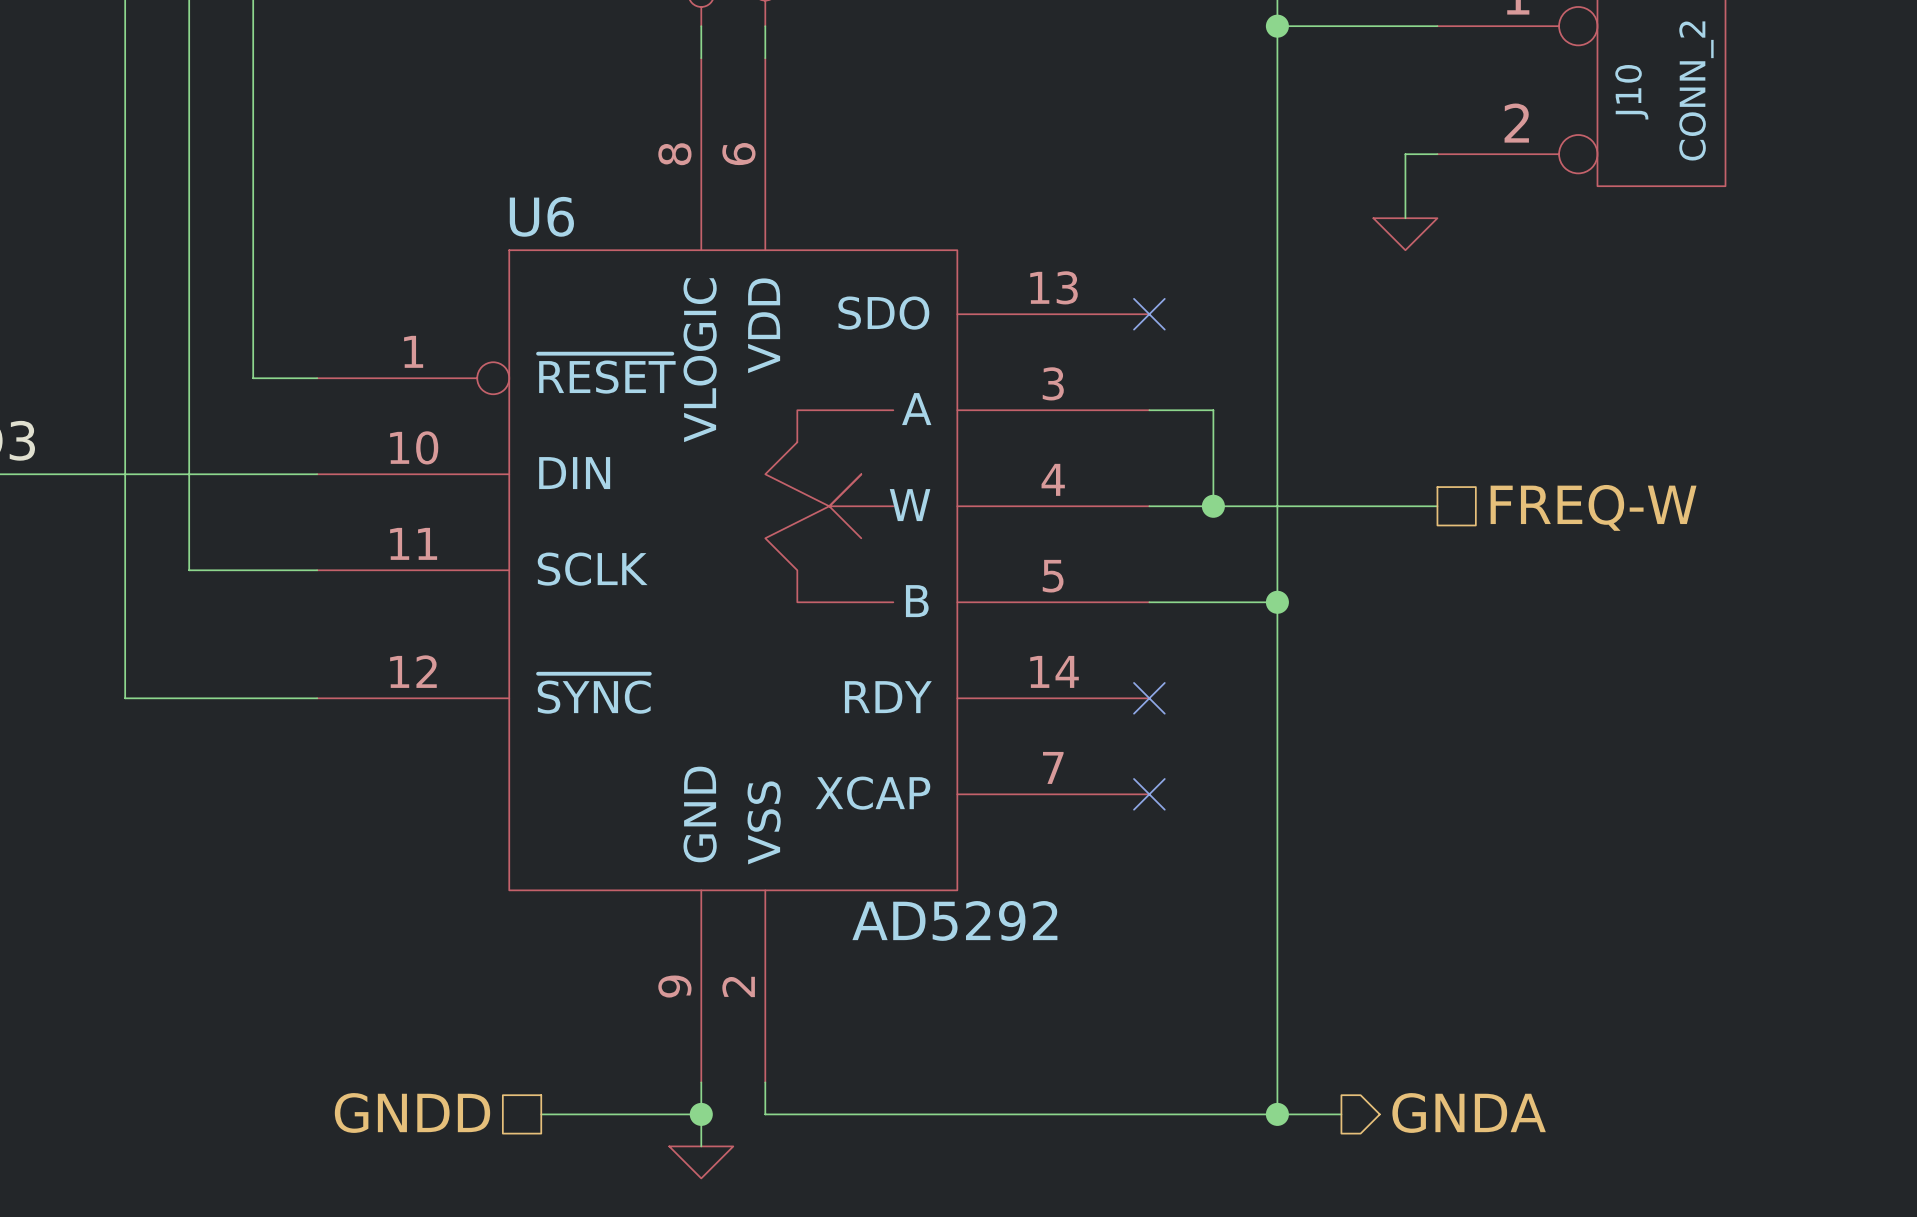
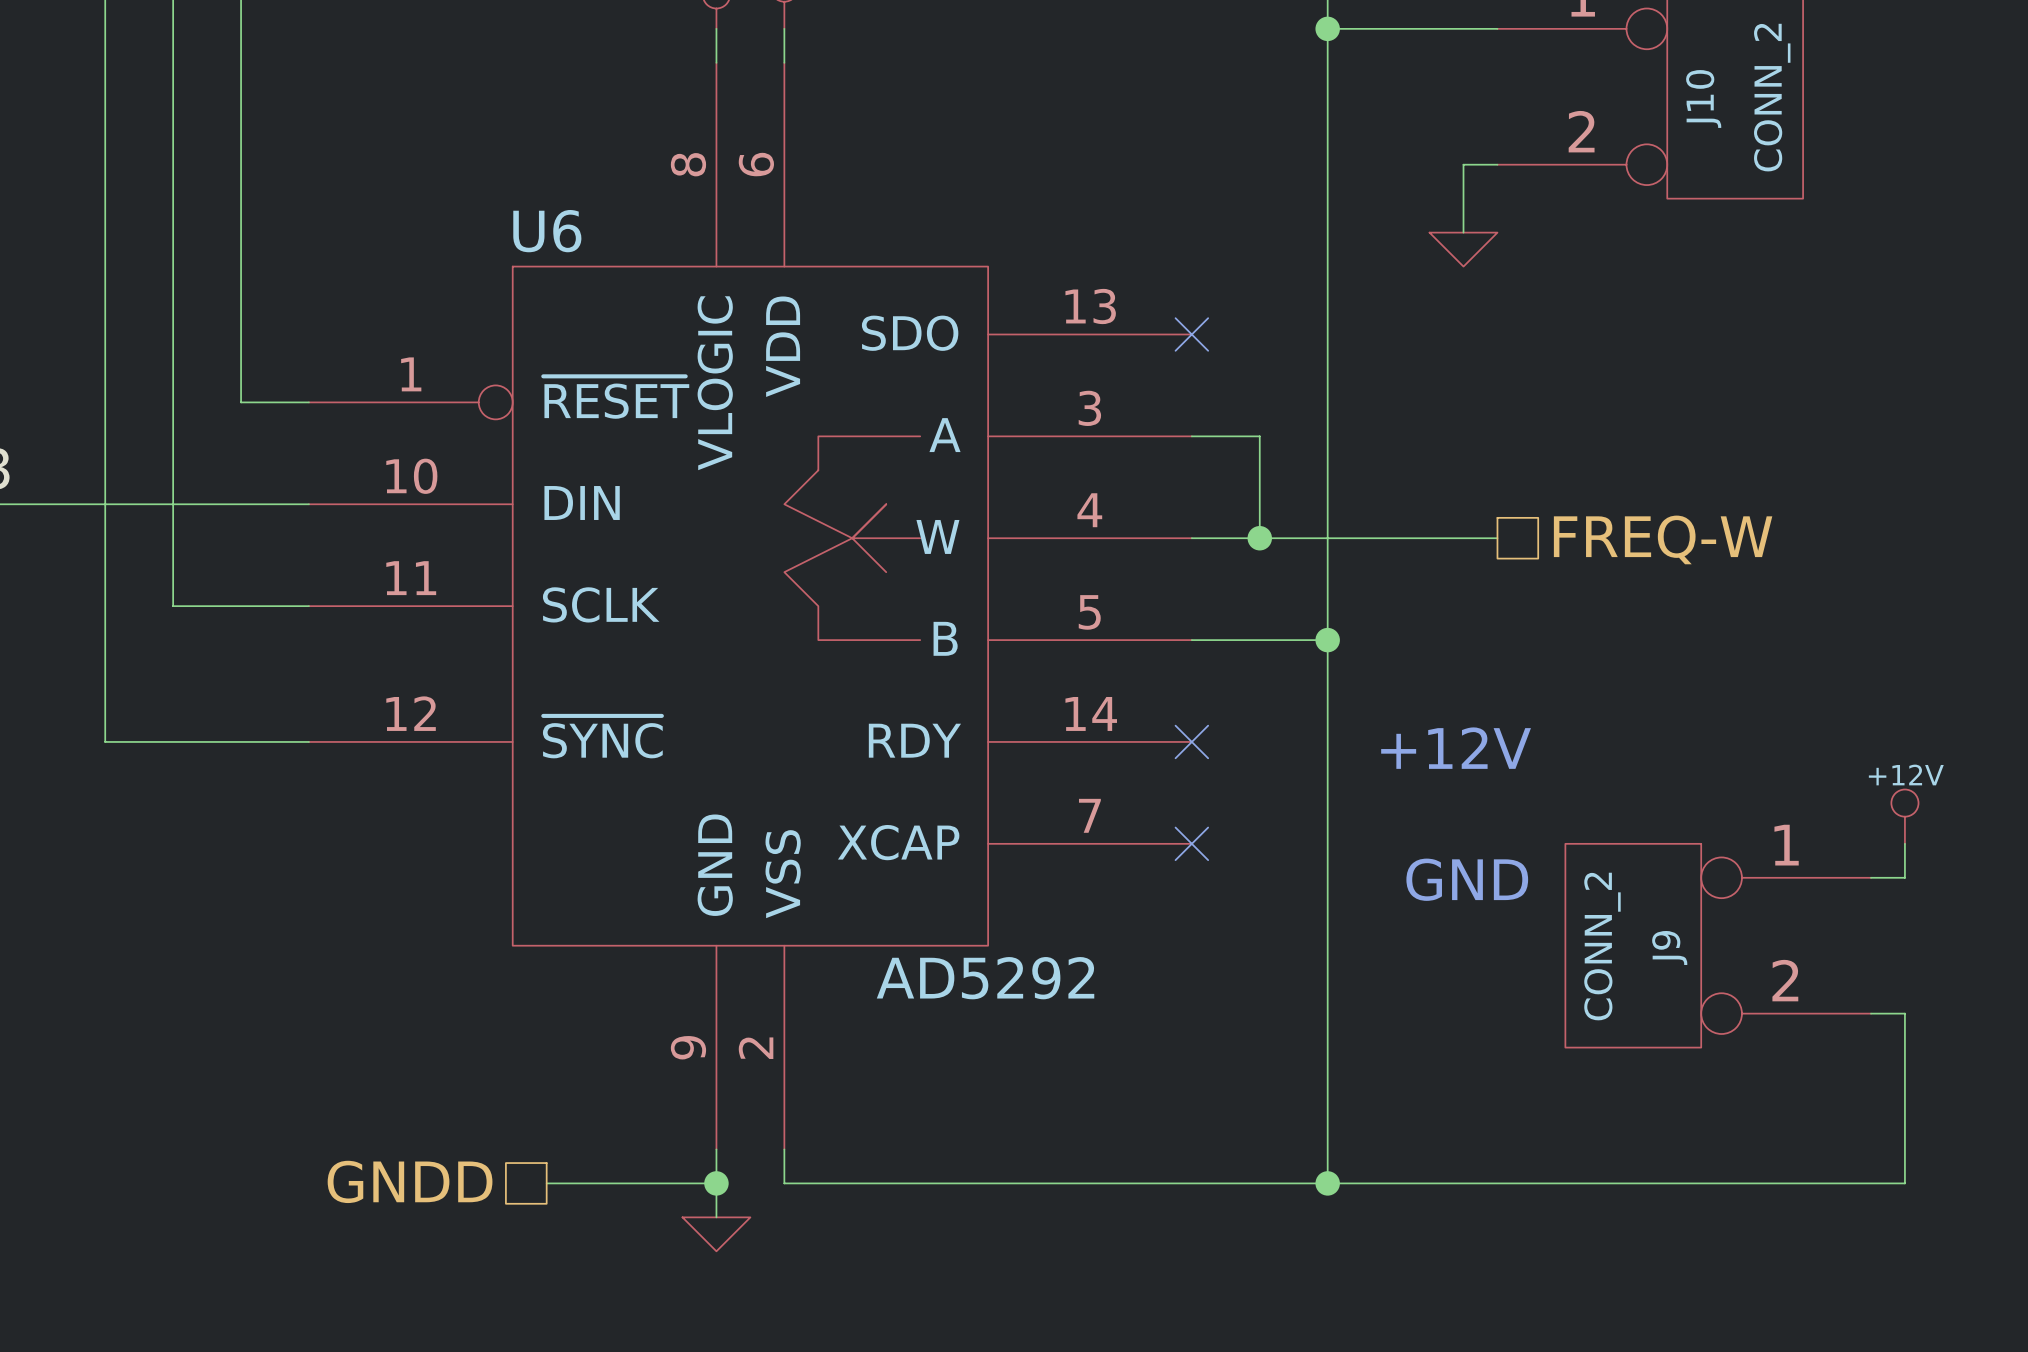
text: none -> +12V (1456, 748)
power symbol: none -> +12V (1904, 816)
wire: none -> (1904, 843) (1904, 877) (1870, 877)
text: none -> GND (1467, 879)
J9: none -> CONN_2 (1718, 945)
wire: none -> (1870, 1013) (1904, 1013) (1904, 1183) (1395, 1183)
hierarchical label: GNDA (1469, 1112) -> none

